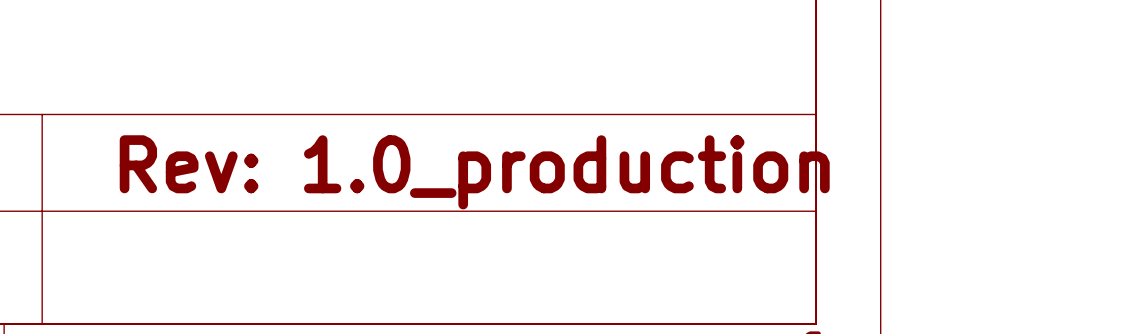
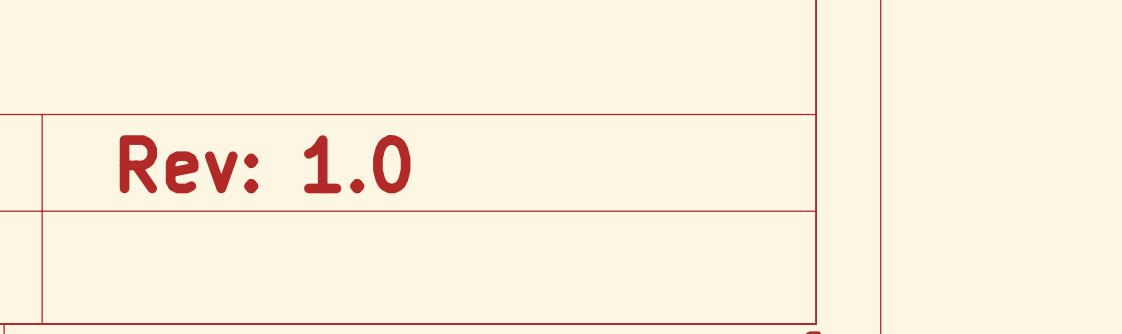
title block: Rev: 1.0_production (474, 172) -> Rev: 1.0 (265, 164)

